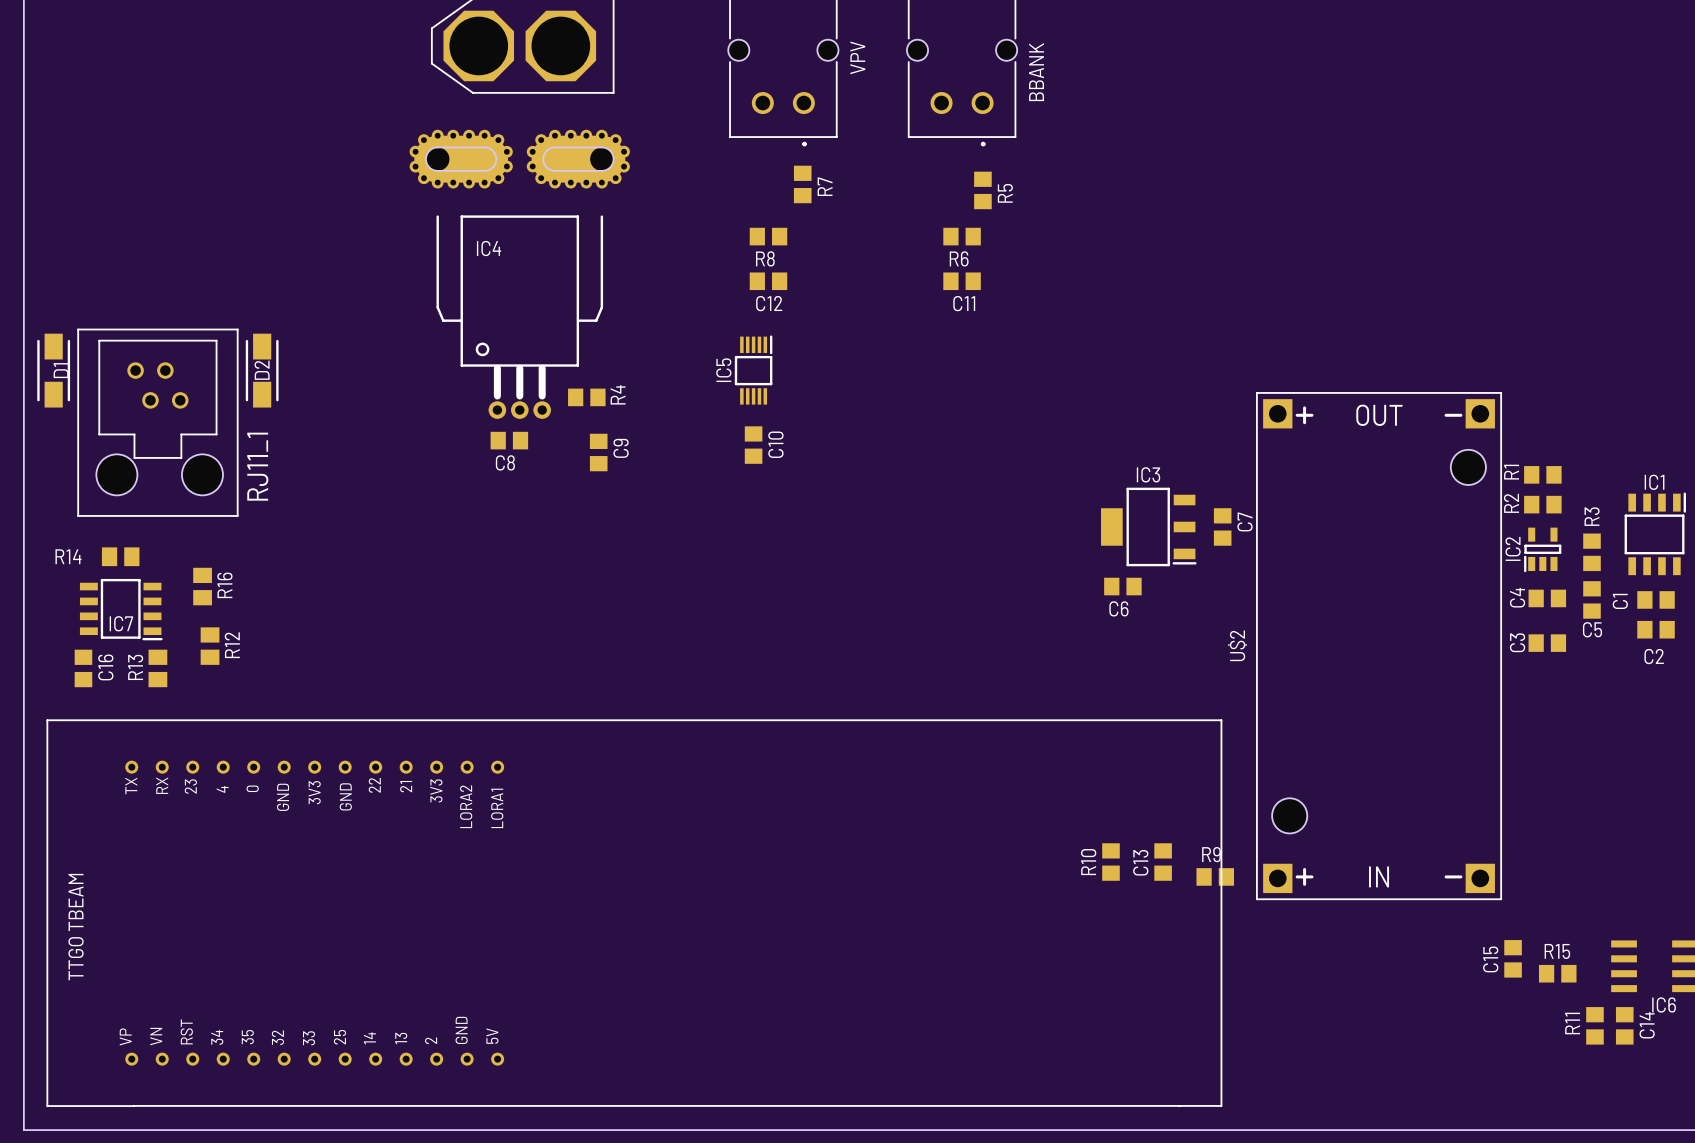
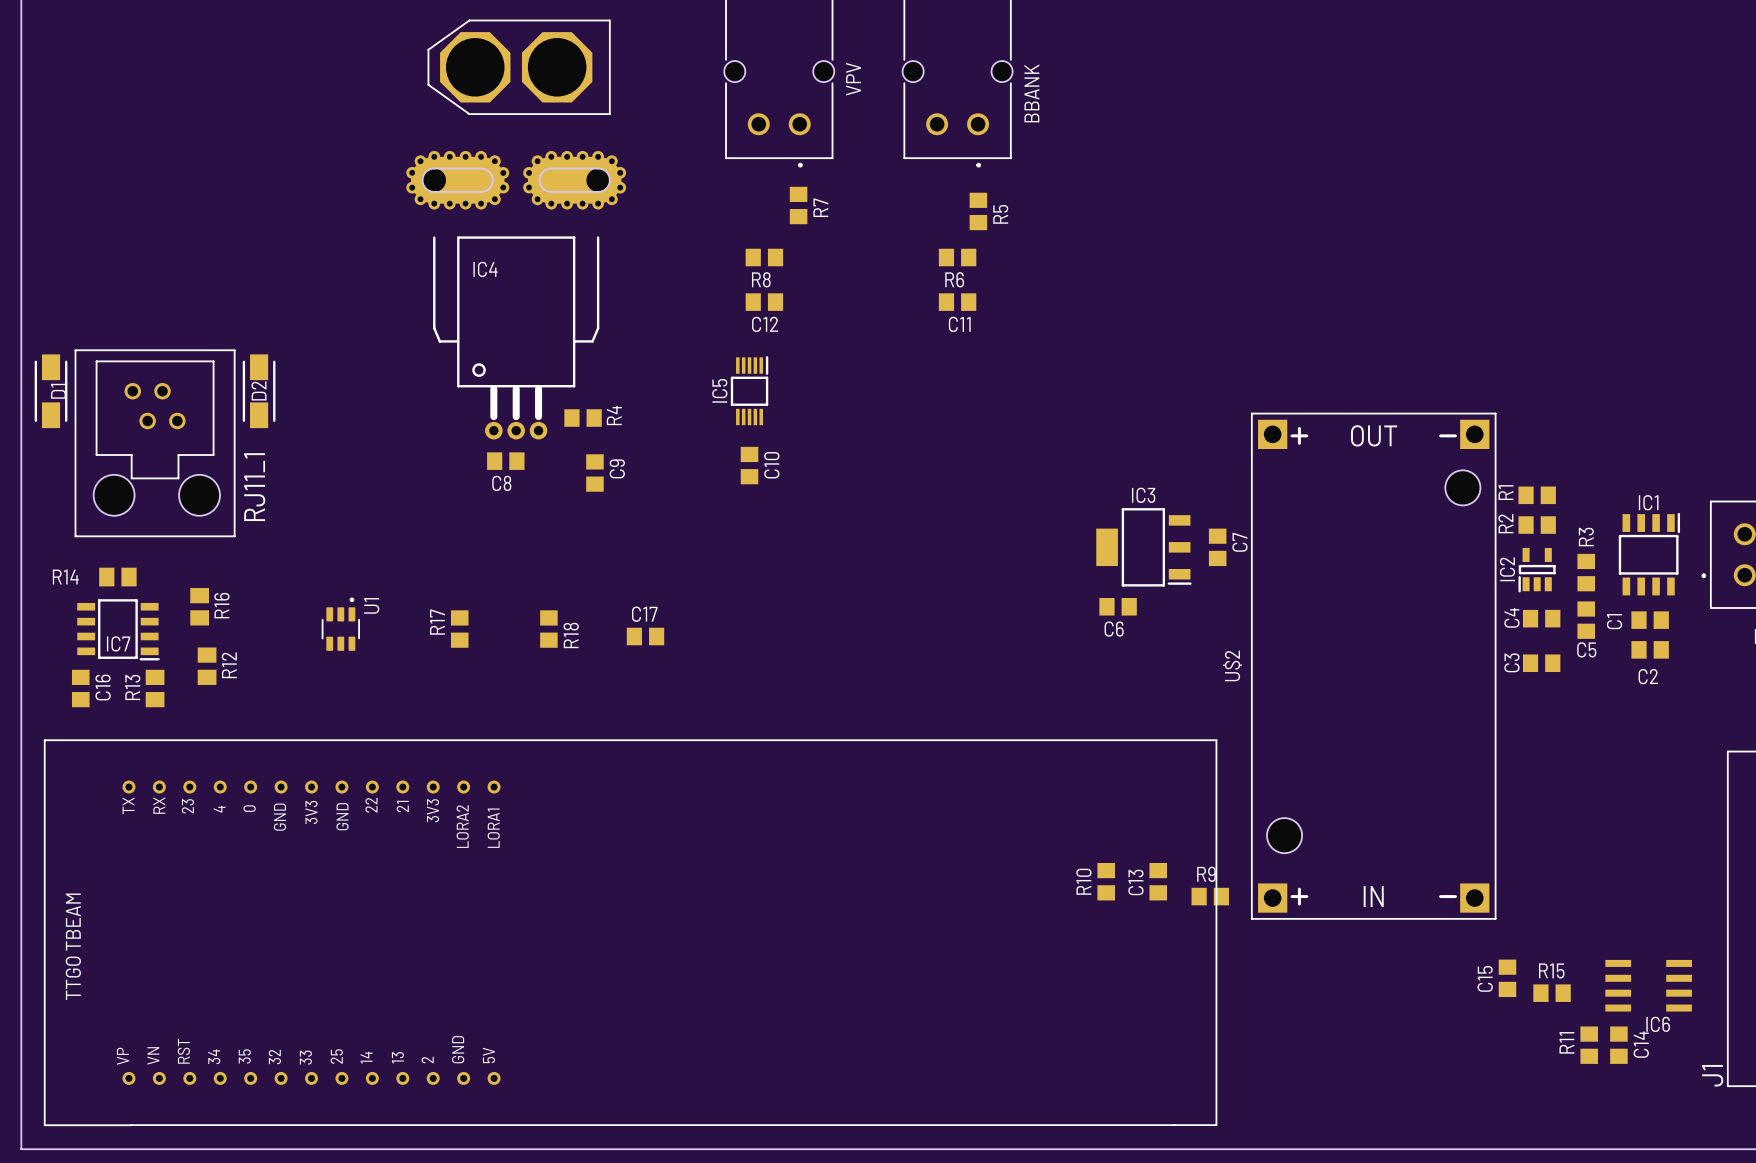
U1: none -> (340, 624)
R17: none -> (459, 629)
R18: none -> (548, 629)
C17: none -> (645, 636)

